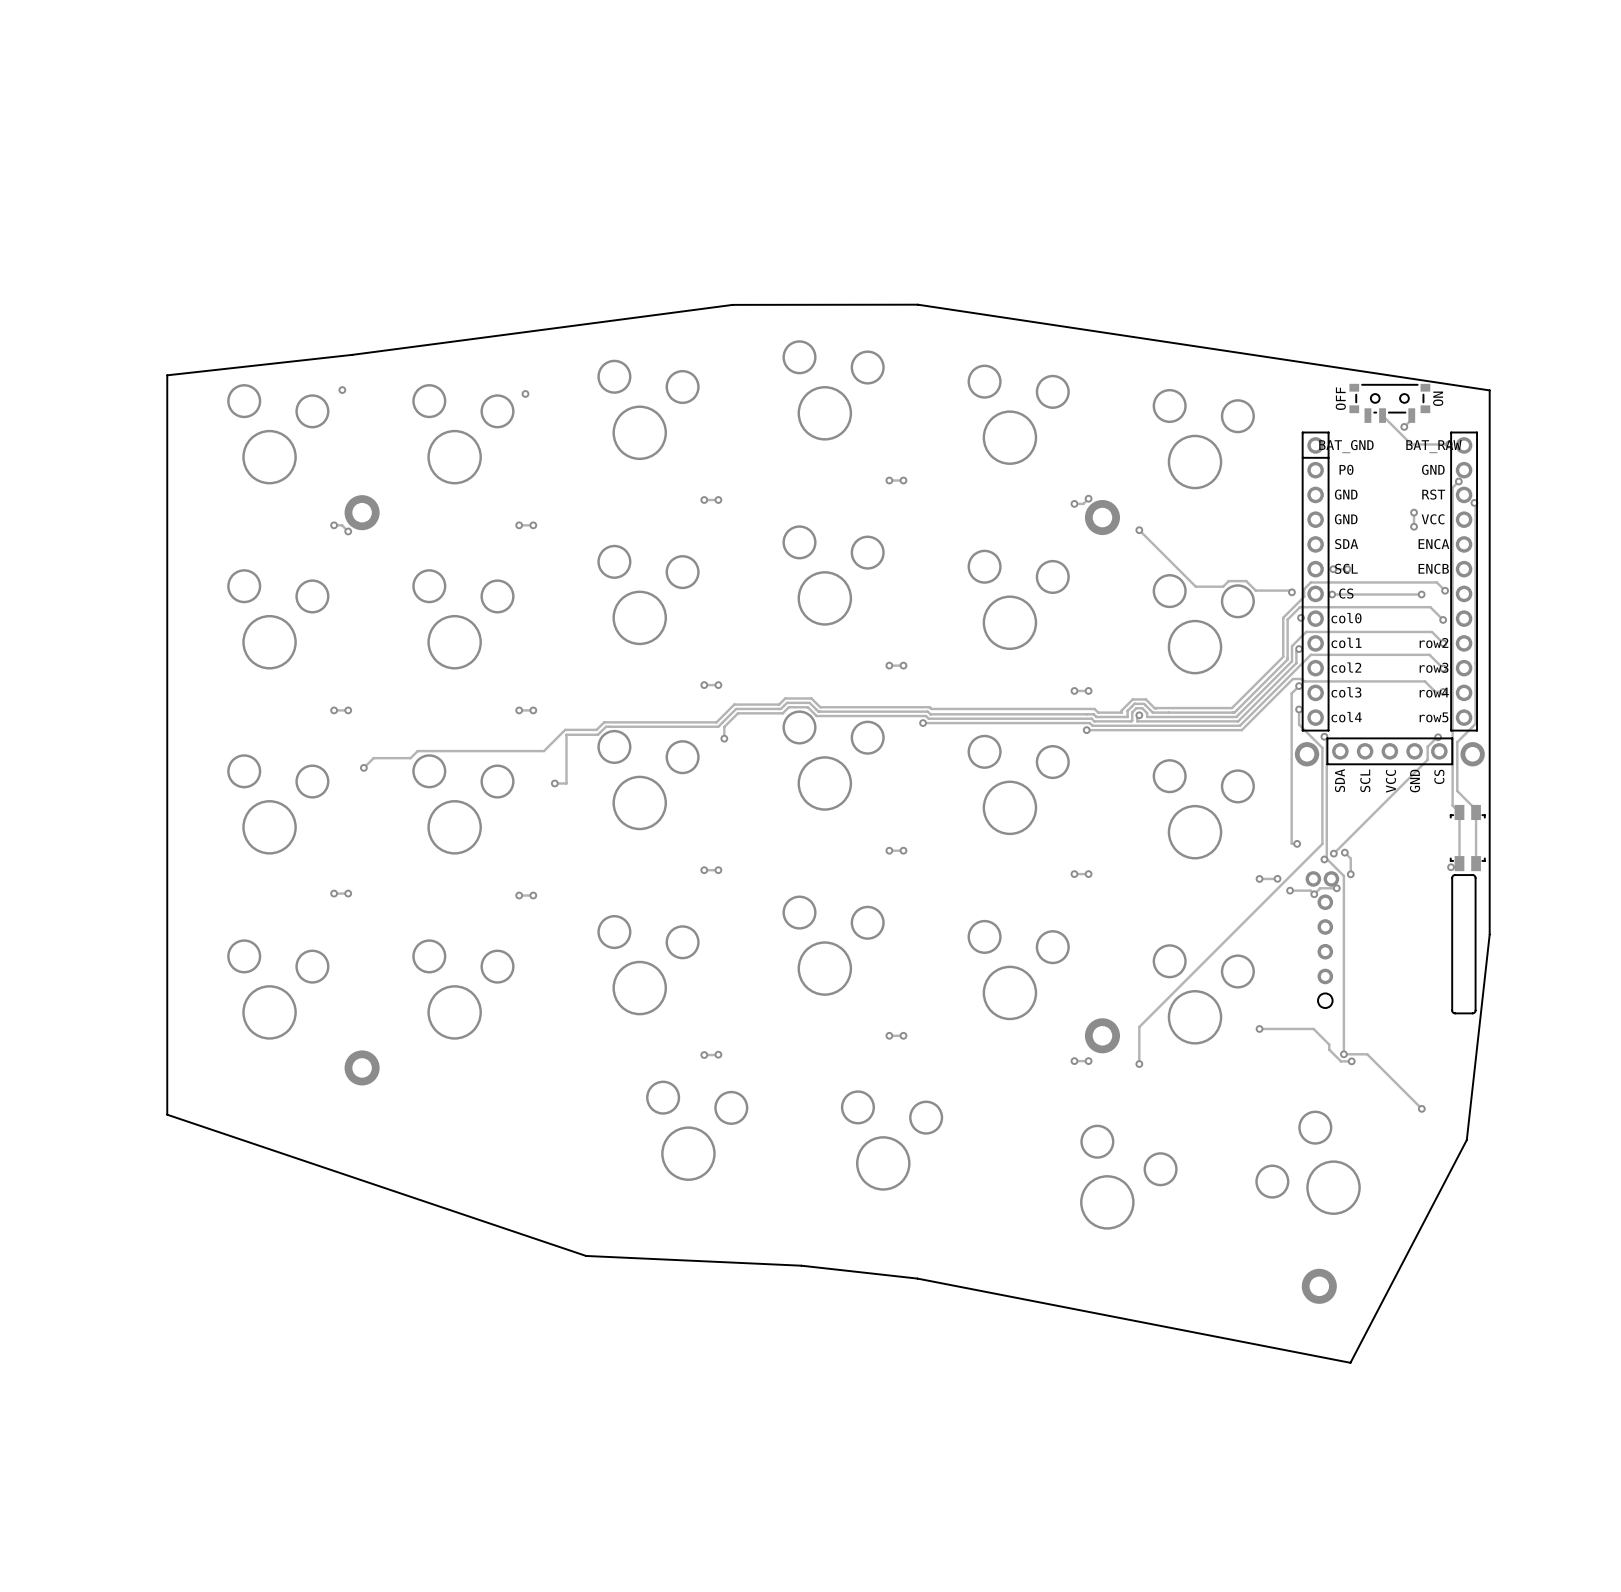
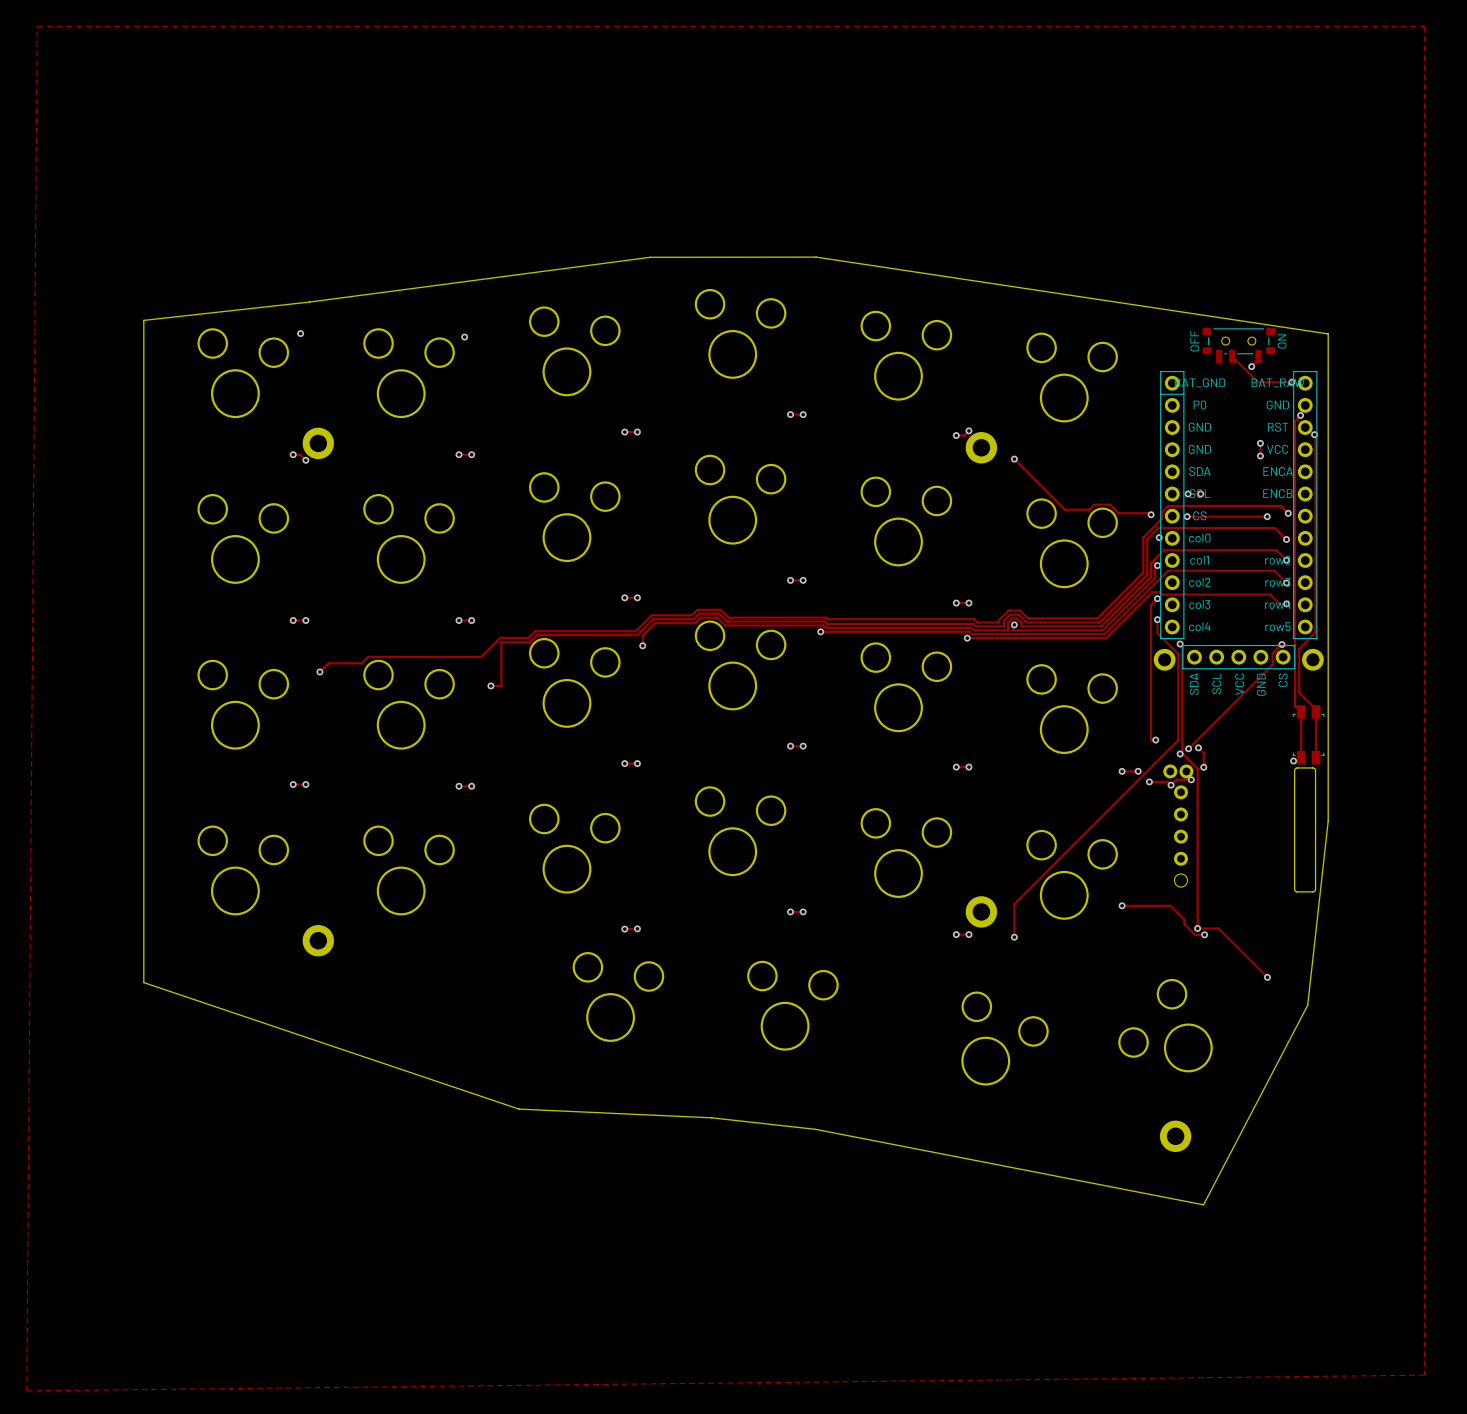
zone outline: none -> (37, 26) (1424, 26) (1424, 1375) (26, 1390) (37, 26)

